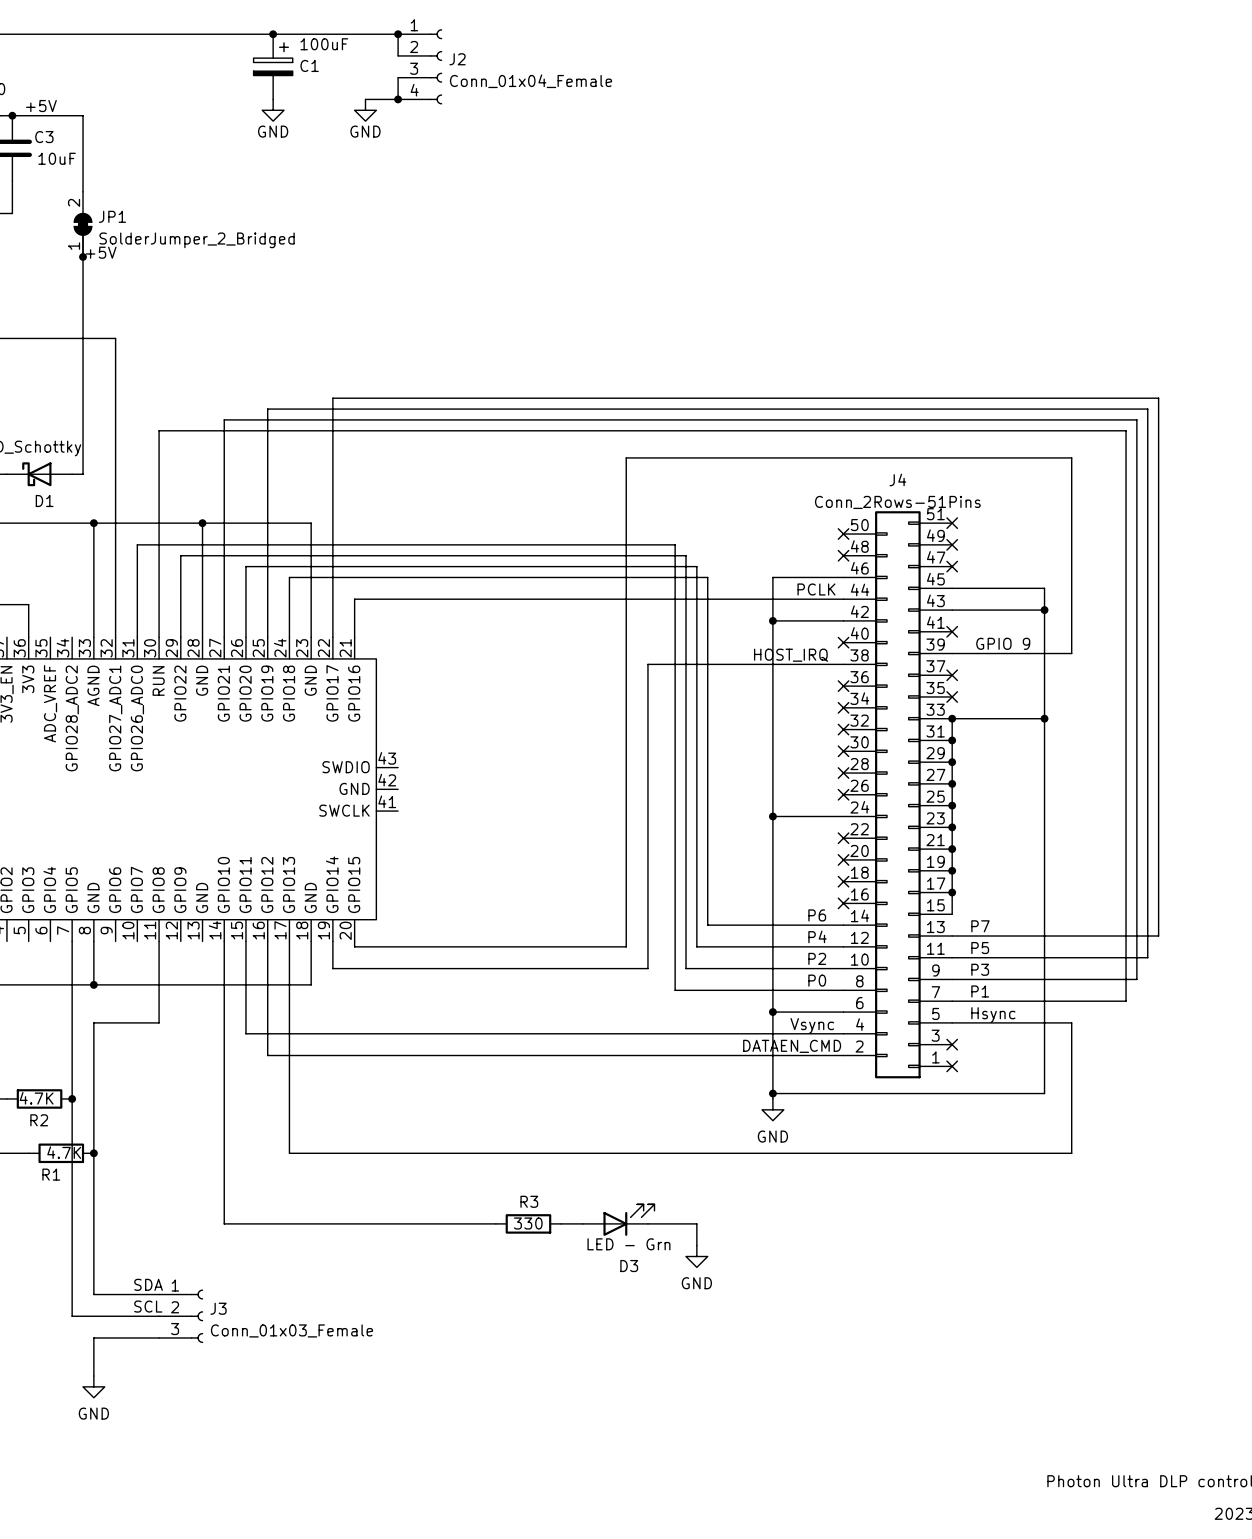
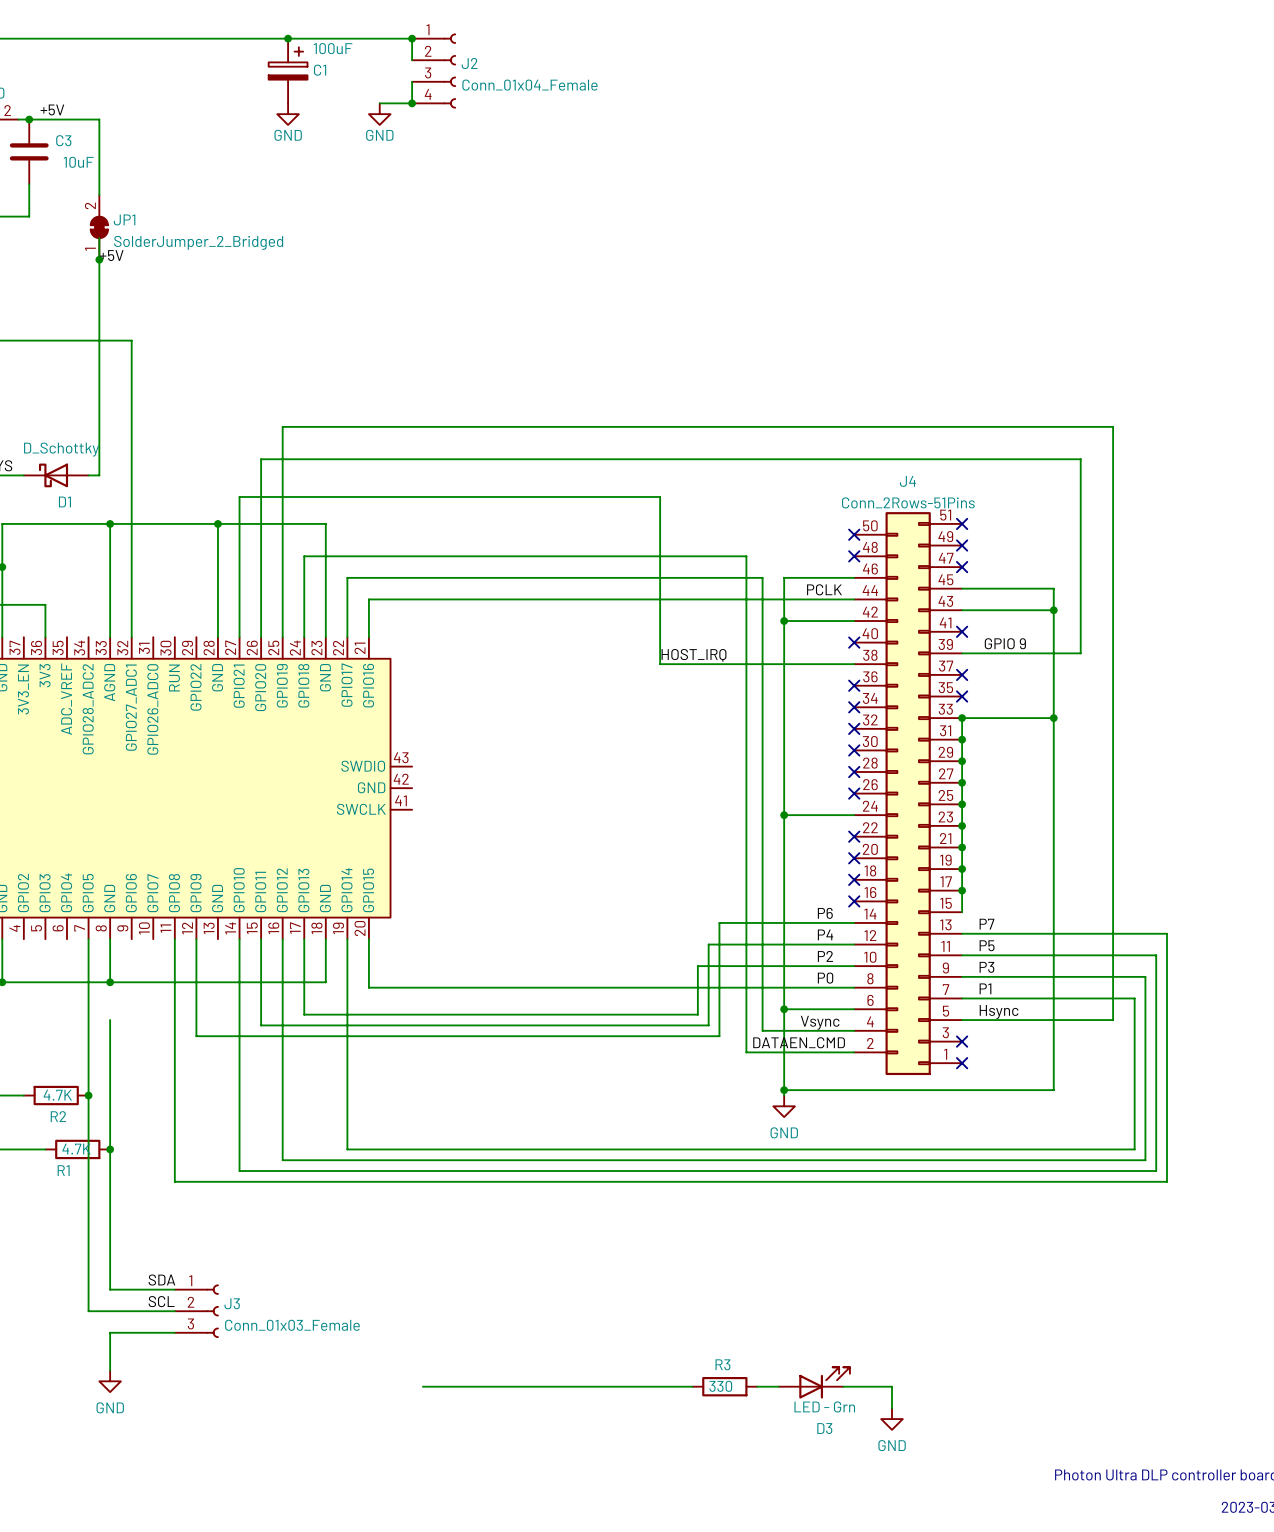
wire: (267, 425) (267, 409) (1147, 409) (1147, 957) -> (282, 426) (1113, 426) (1113, 1020) (1080, 1020)
wire: (626, 457) (626, 946) (354, 946) -> (638, 459) (261, 459) (261, 567)
wire: (224, 495) (224, 419) (1136, 419) (1136, 979) -> none
wire: (289, 555) (180, 555) (180, 637) -> (304, 556) (304, 577)
wire: (686, 555) (686, 968) -> (697, 556) (746, 556) (746, 1052)
wire: (245, 566) (696, 566) (696, 946) -> none
wire: (289, 577) (332, 577) (332, 398) (1158, 398) (1158, 936) -> (174, 1020) (174, 1181) (1167, 1181) (1167, 933)
wire: (707, 577) (707, 925) -> (719, 577) (762, 577) (762, 1030)
wire: (137, 637) (137, 544) (675, 544) (675, 990) -> (368, 944) (368, 987) (687, 987)
wire: (159, 637) (159, 430) (1126, 430) (1126, 1001) -> none
label position: HOST_IRQ (791, 655) -> HOST_IRQ (693, 655)
wire: (647, 664) (647, 968) (332, 968) -> (660, 664) (660, 497) (239, 497)
wire: none -> (719, 922) (719, 1036) (196, 1036) (196, 939)
wire: none -> (697, 966) (697, 1014) (304, 1014)
wire: (289, 1017) (289, 1153) (332, 1153) -> (347, 966) (347, 1149)
wire: (93, 1022) (159, 1022) -> none
wire: (1071, 1022) (1071, 1153) -> (1134, 998) (1134, 1149) (1080, 1149)
wire: (245, 1028) (245, 1033) (751, 1033) -> (261, 1025) (708, 1025) (708, 944)
wire: (267, 1055) (734, 1055) -> (282, 1052) (282, 1160) (1145, 1160) (1145, 976)
wire: (224, 1175) (224, 1223) (495, 1223) -> (239, 1171) (1156, 1171) (1156, 955)
D3 position: (618, 1220) -> (814, 1382)
R3 position: (528, 1223) -> (724, 1386)
wire: (561, 1223) (582, 1223) -> none
wire: (647, 1223) (696, 1223) (696, 1245) -> none
power symbol: GND (696, 1256) -> none
wire: none -> (422, 1386) (692, 1386)
wire: none -> (757, 1386) (778, 1386)
wire: none -> (843, 1386) (891, 1386) (891, 1408)
power symbol: none -> GND (891, 1419)

